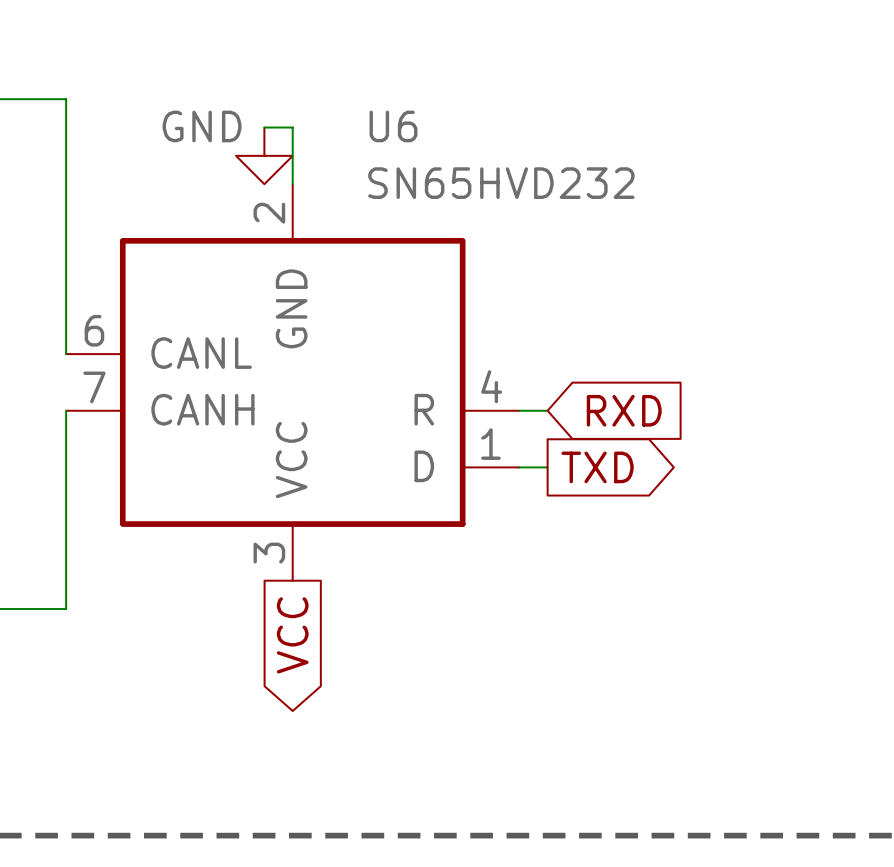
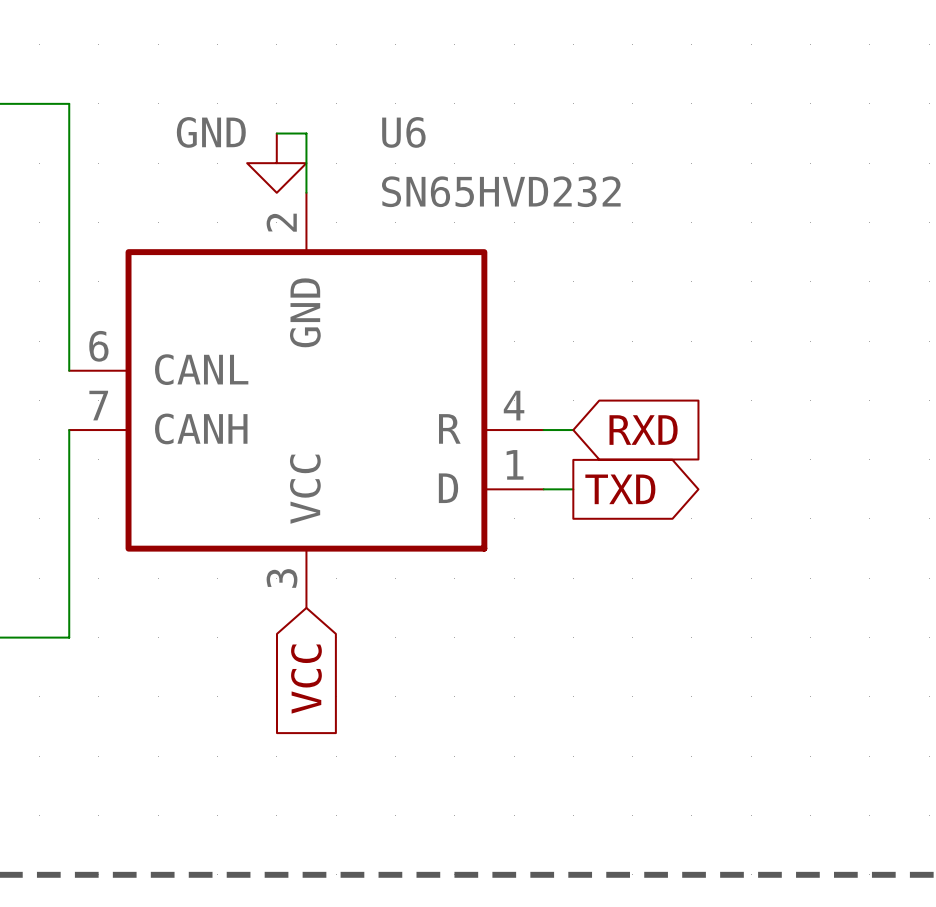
global label shape: output (292, 635) -> input (306, 679)

